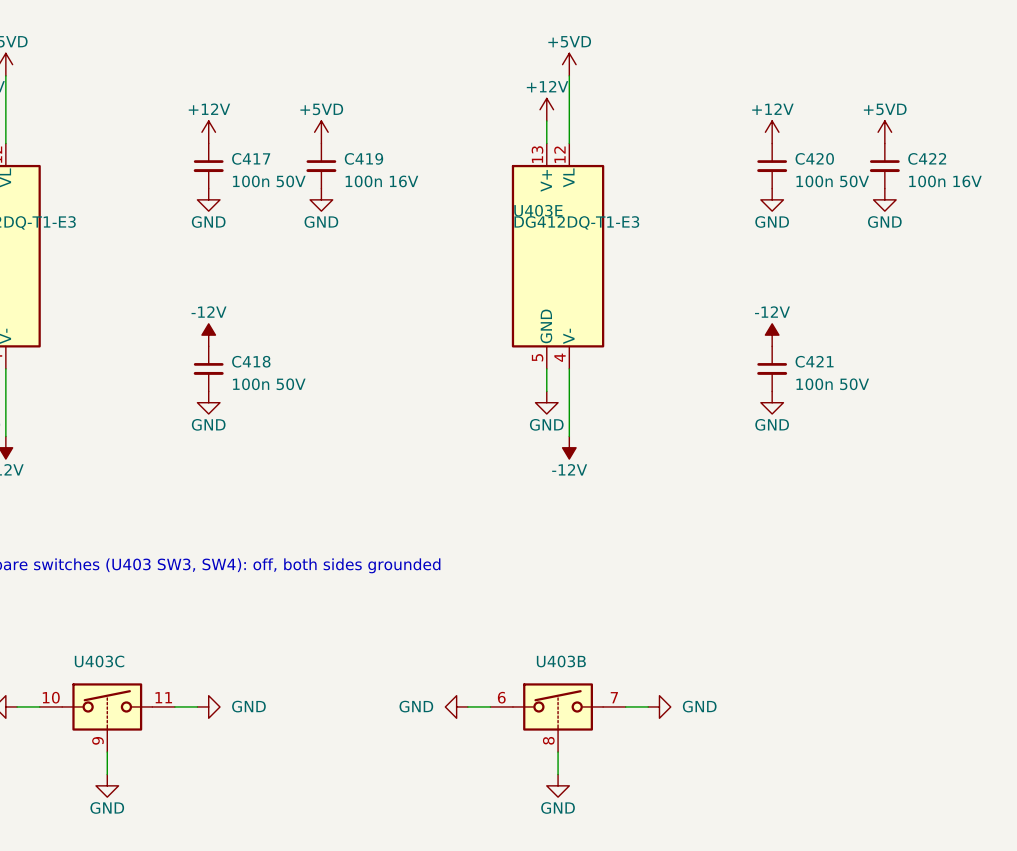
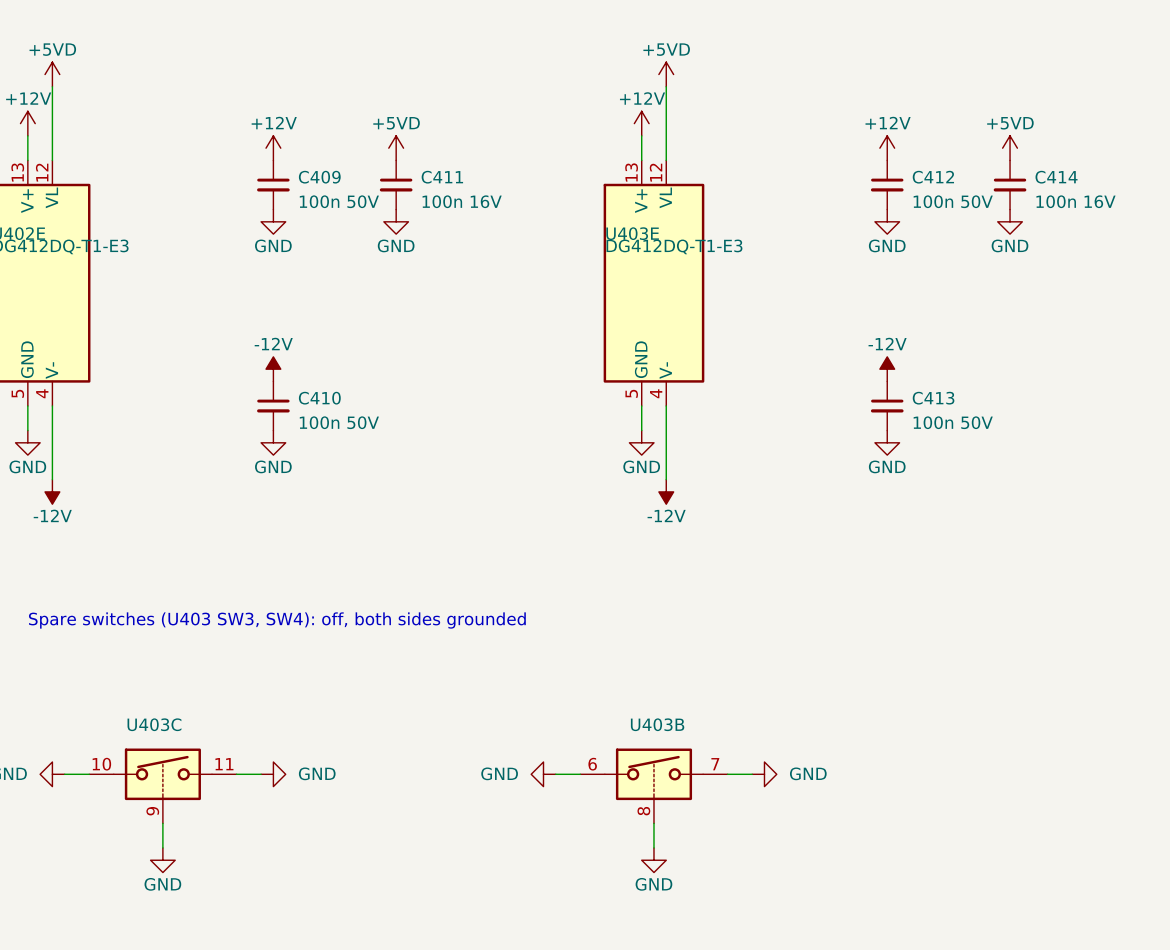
C417 name: C417 (251, 158) -> C409 (319, 177)
C419 name: C419 (363, 158) -> C411 (442, 177)
C420 name: C420 (814, 158) -> C412 (933, 177)
C422 name: C422 (927, 158) -> C414 (1056, 177)
C418 name: C418 (251, 361) -> C410 (319, 398)
C421 name: C421 (814, 361) -> C413 (933, 398)

